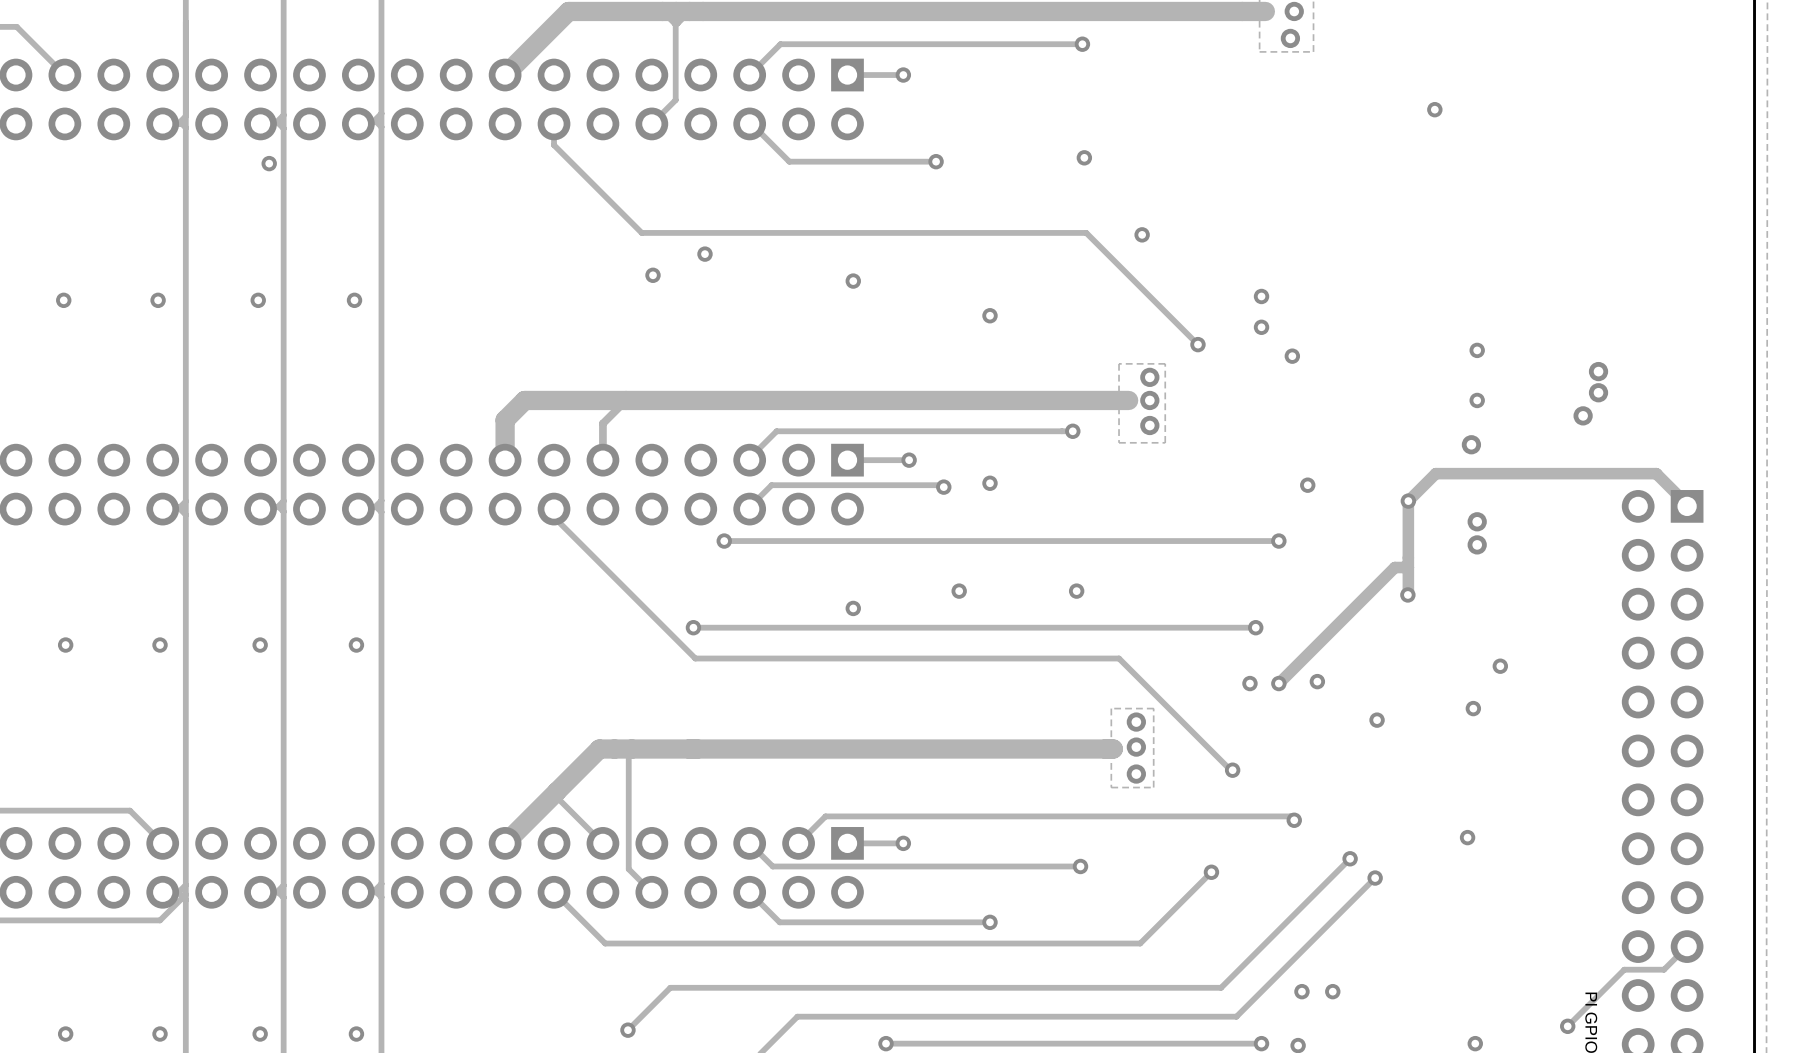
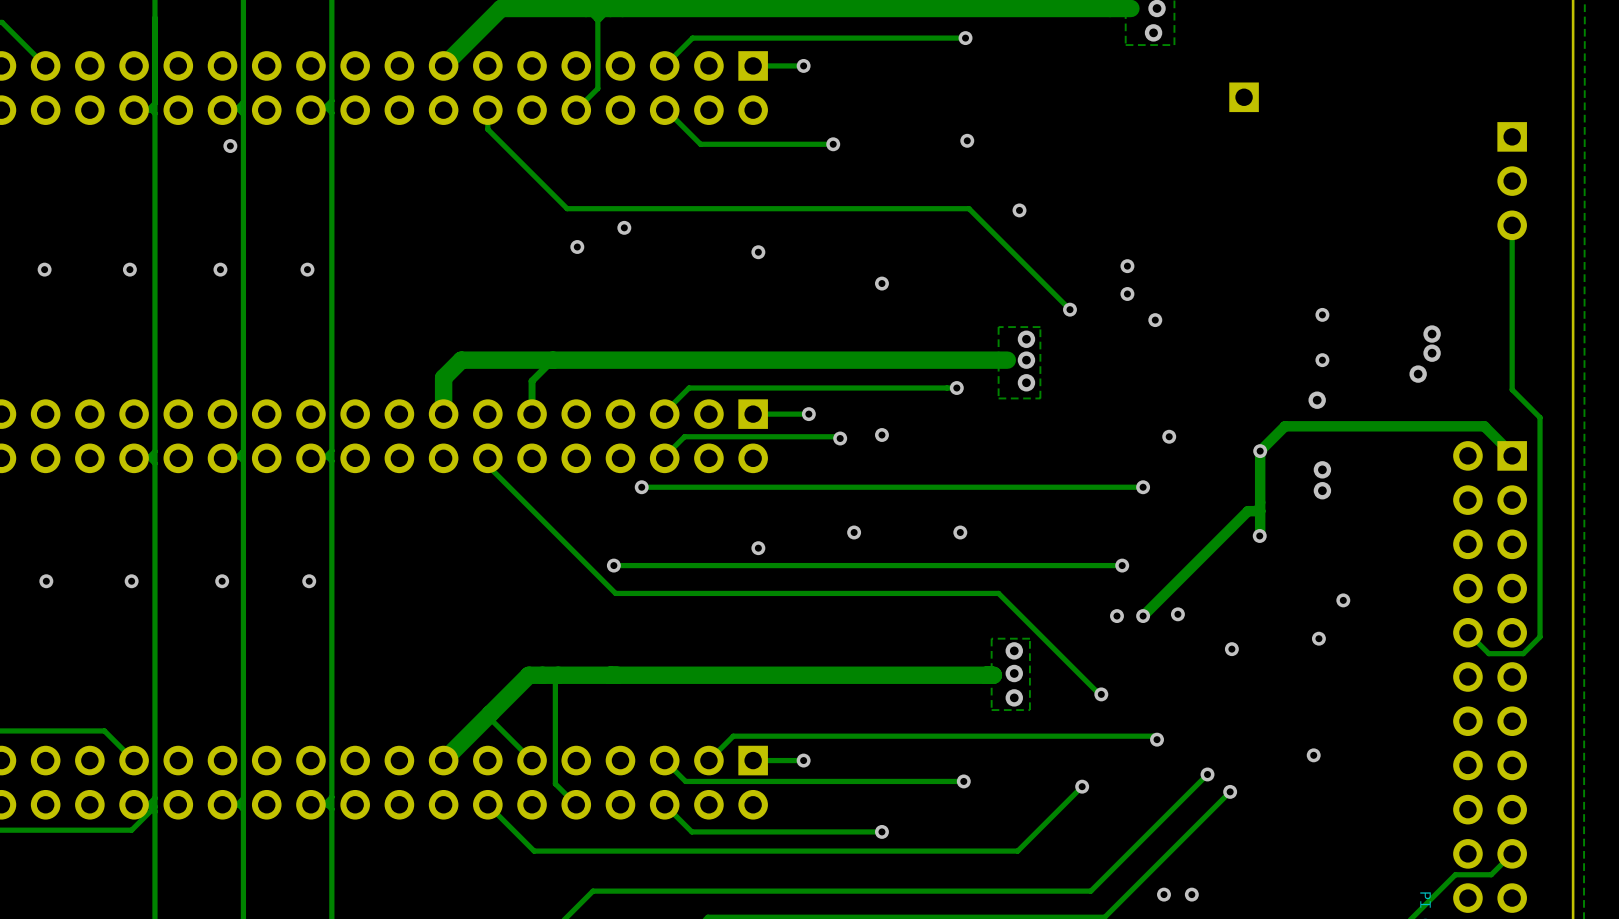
part: none -> (1244, 97)
via: (1434, 109) -> none
part: none -> (1512, 181)
track: none -> (1512, 225) (1512, 389) (1540, 417) (1540, 636) (1523, 653) (1488, 653) (1467, 632)

